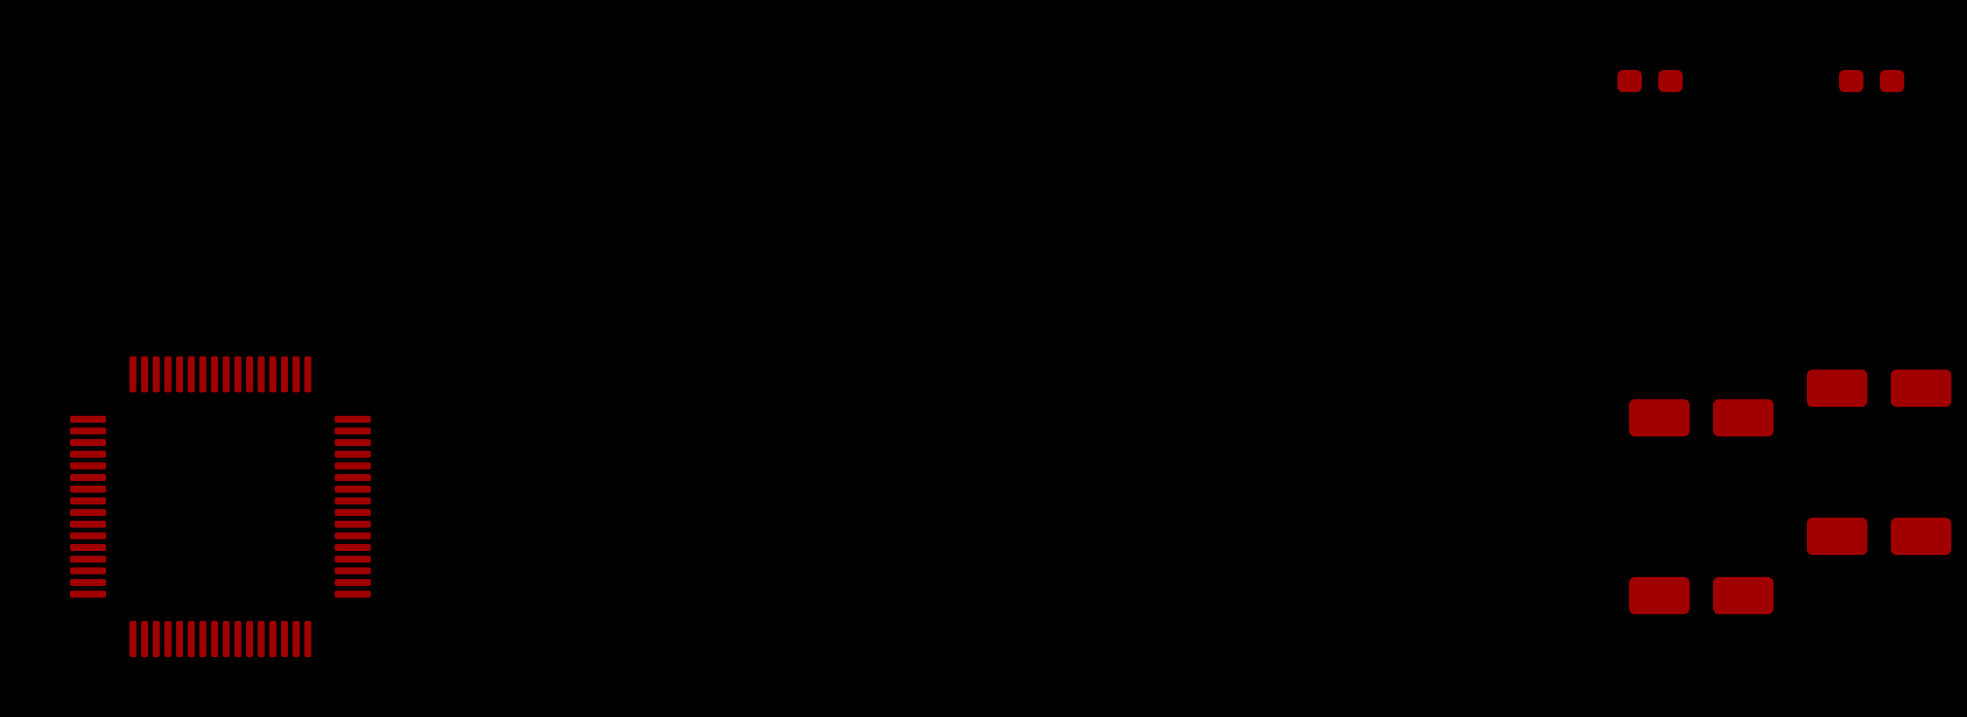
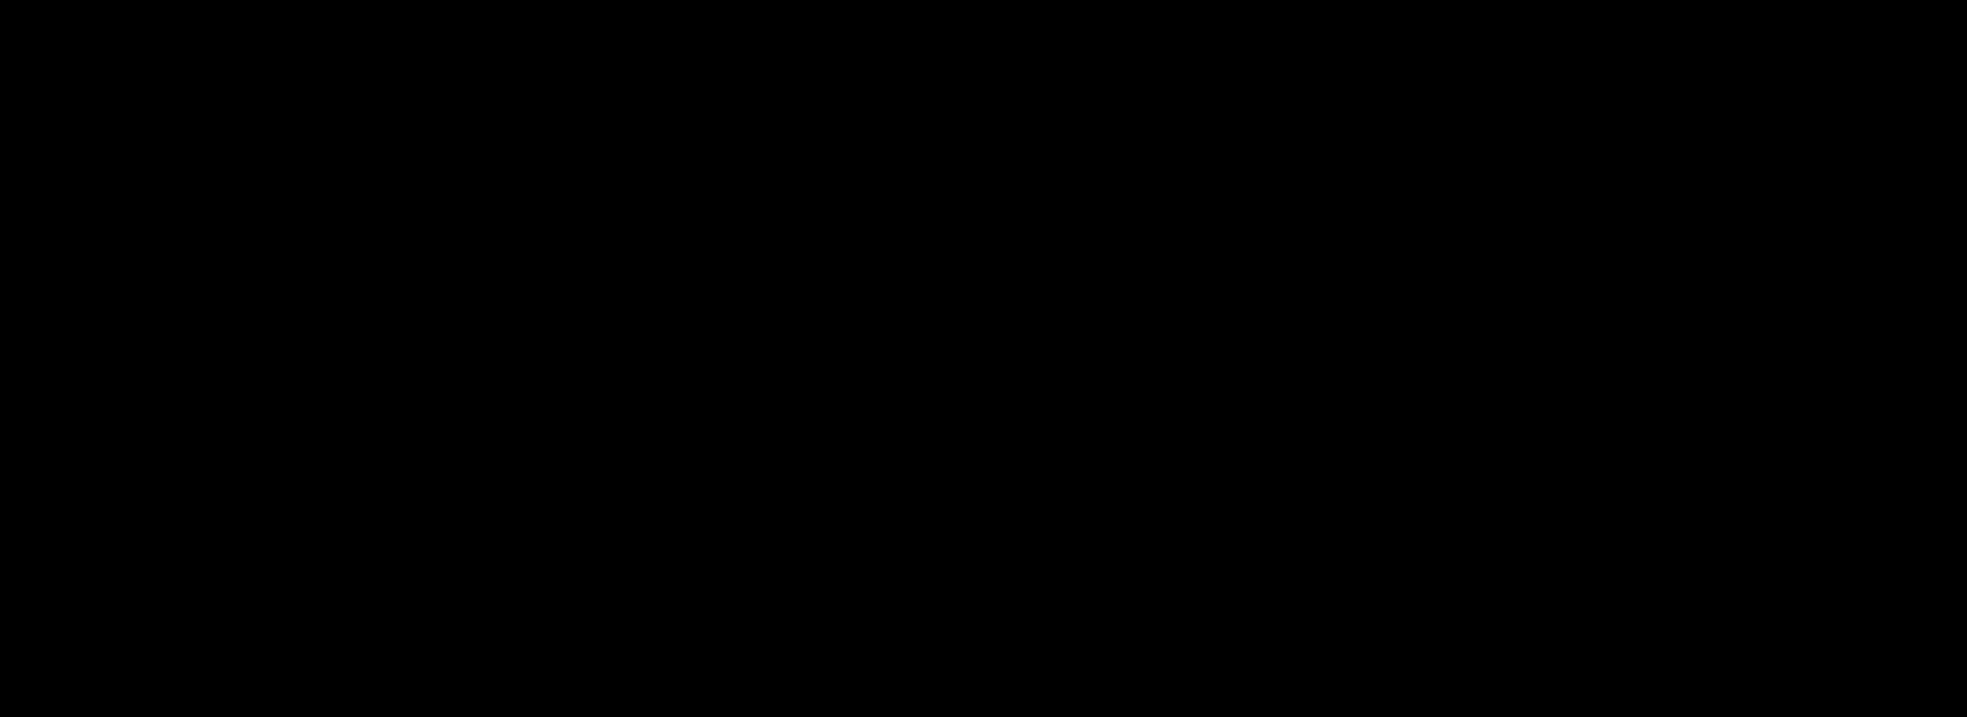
part: (1650, 81) -> none
part: (1871, 81) -> none
part: (1879, 388) -> none
part: (1701, 417) -> none
part: (220, 506) -> none
part: (1879, 536) -> none
part: (1701, 595) -> none

